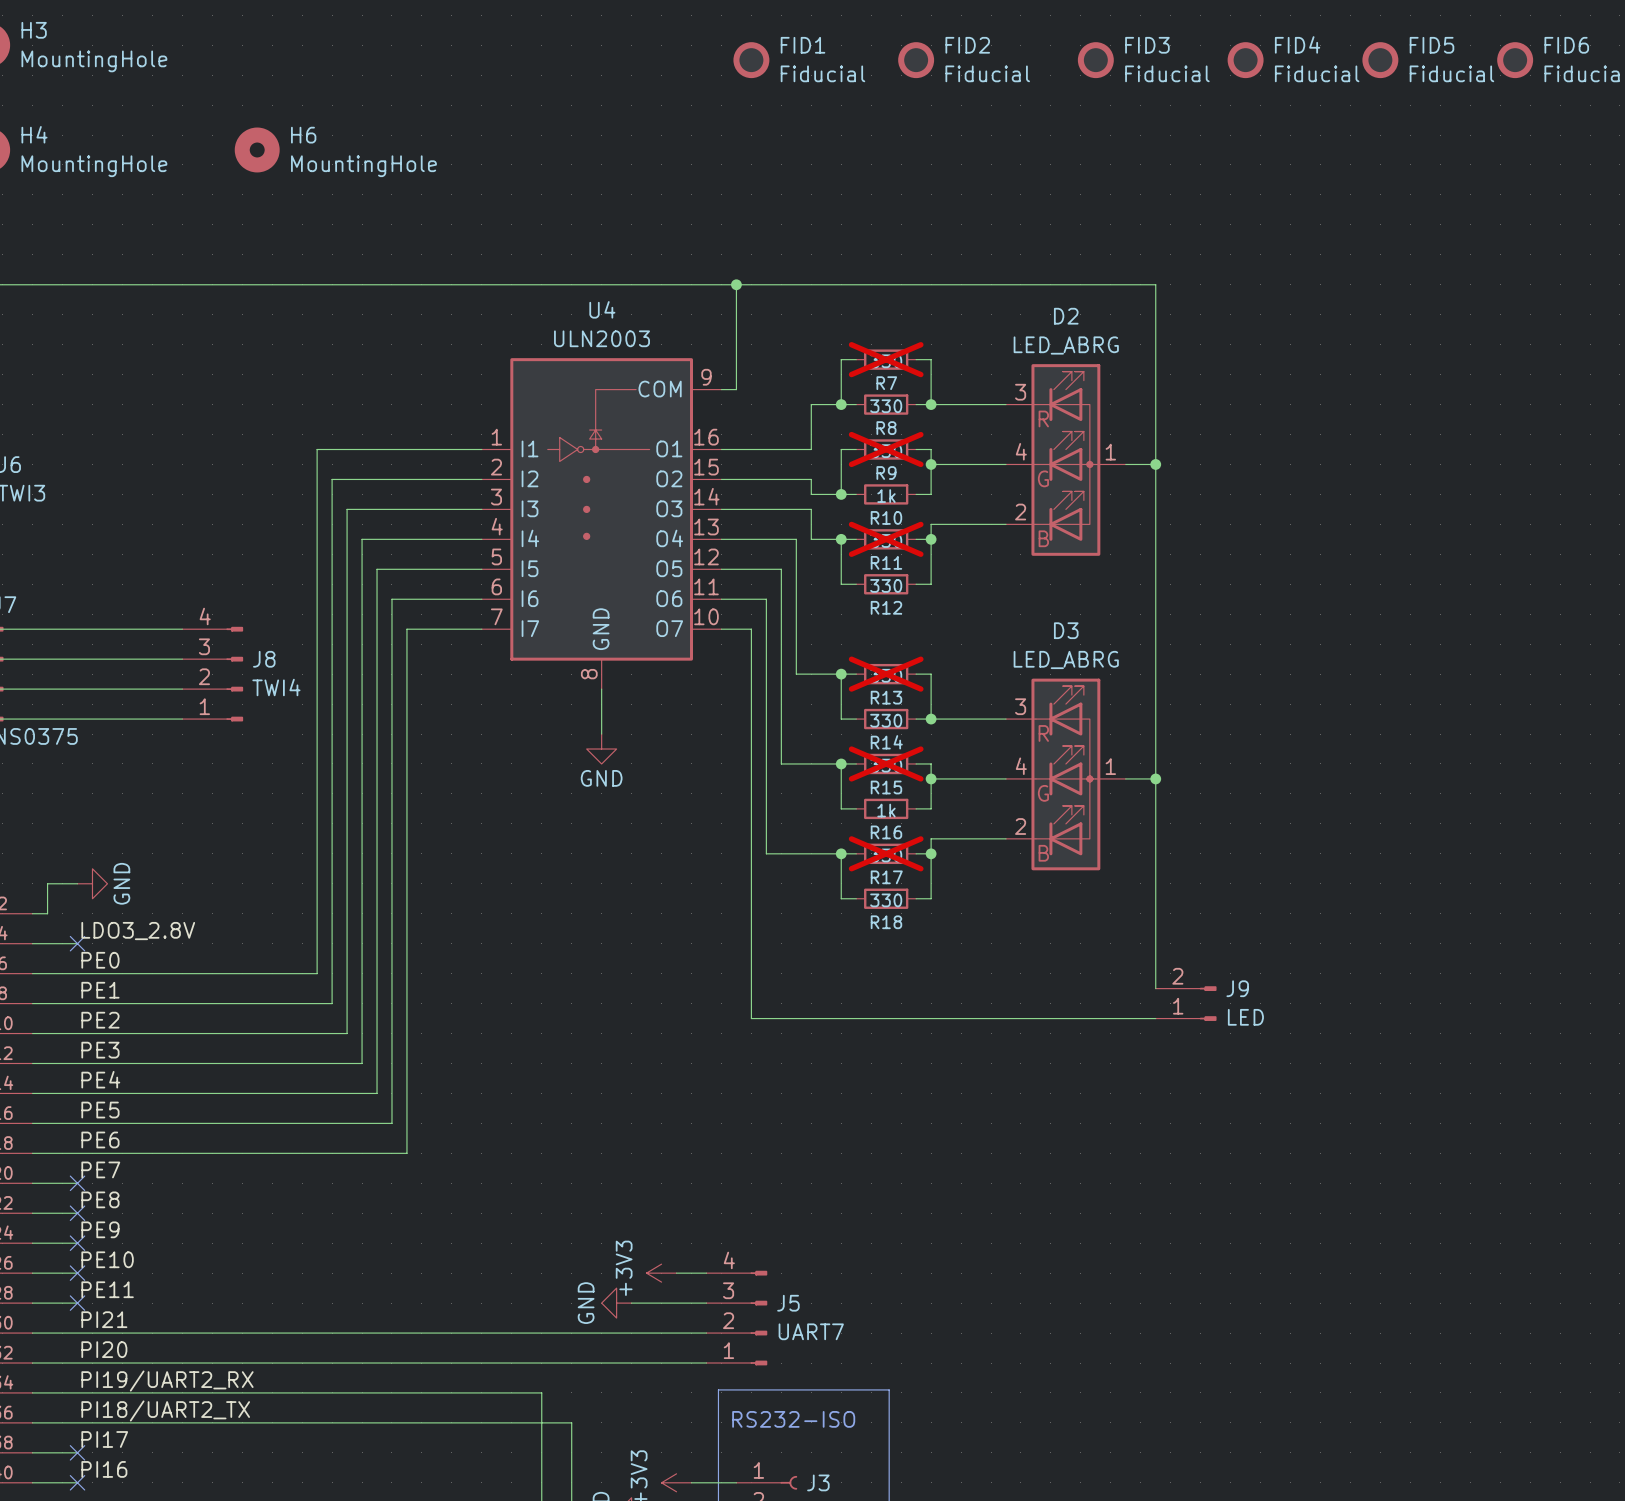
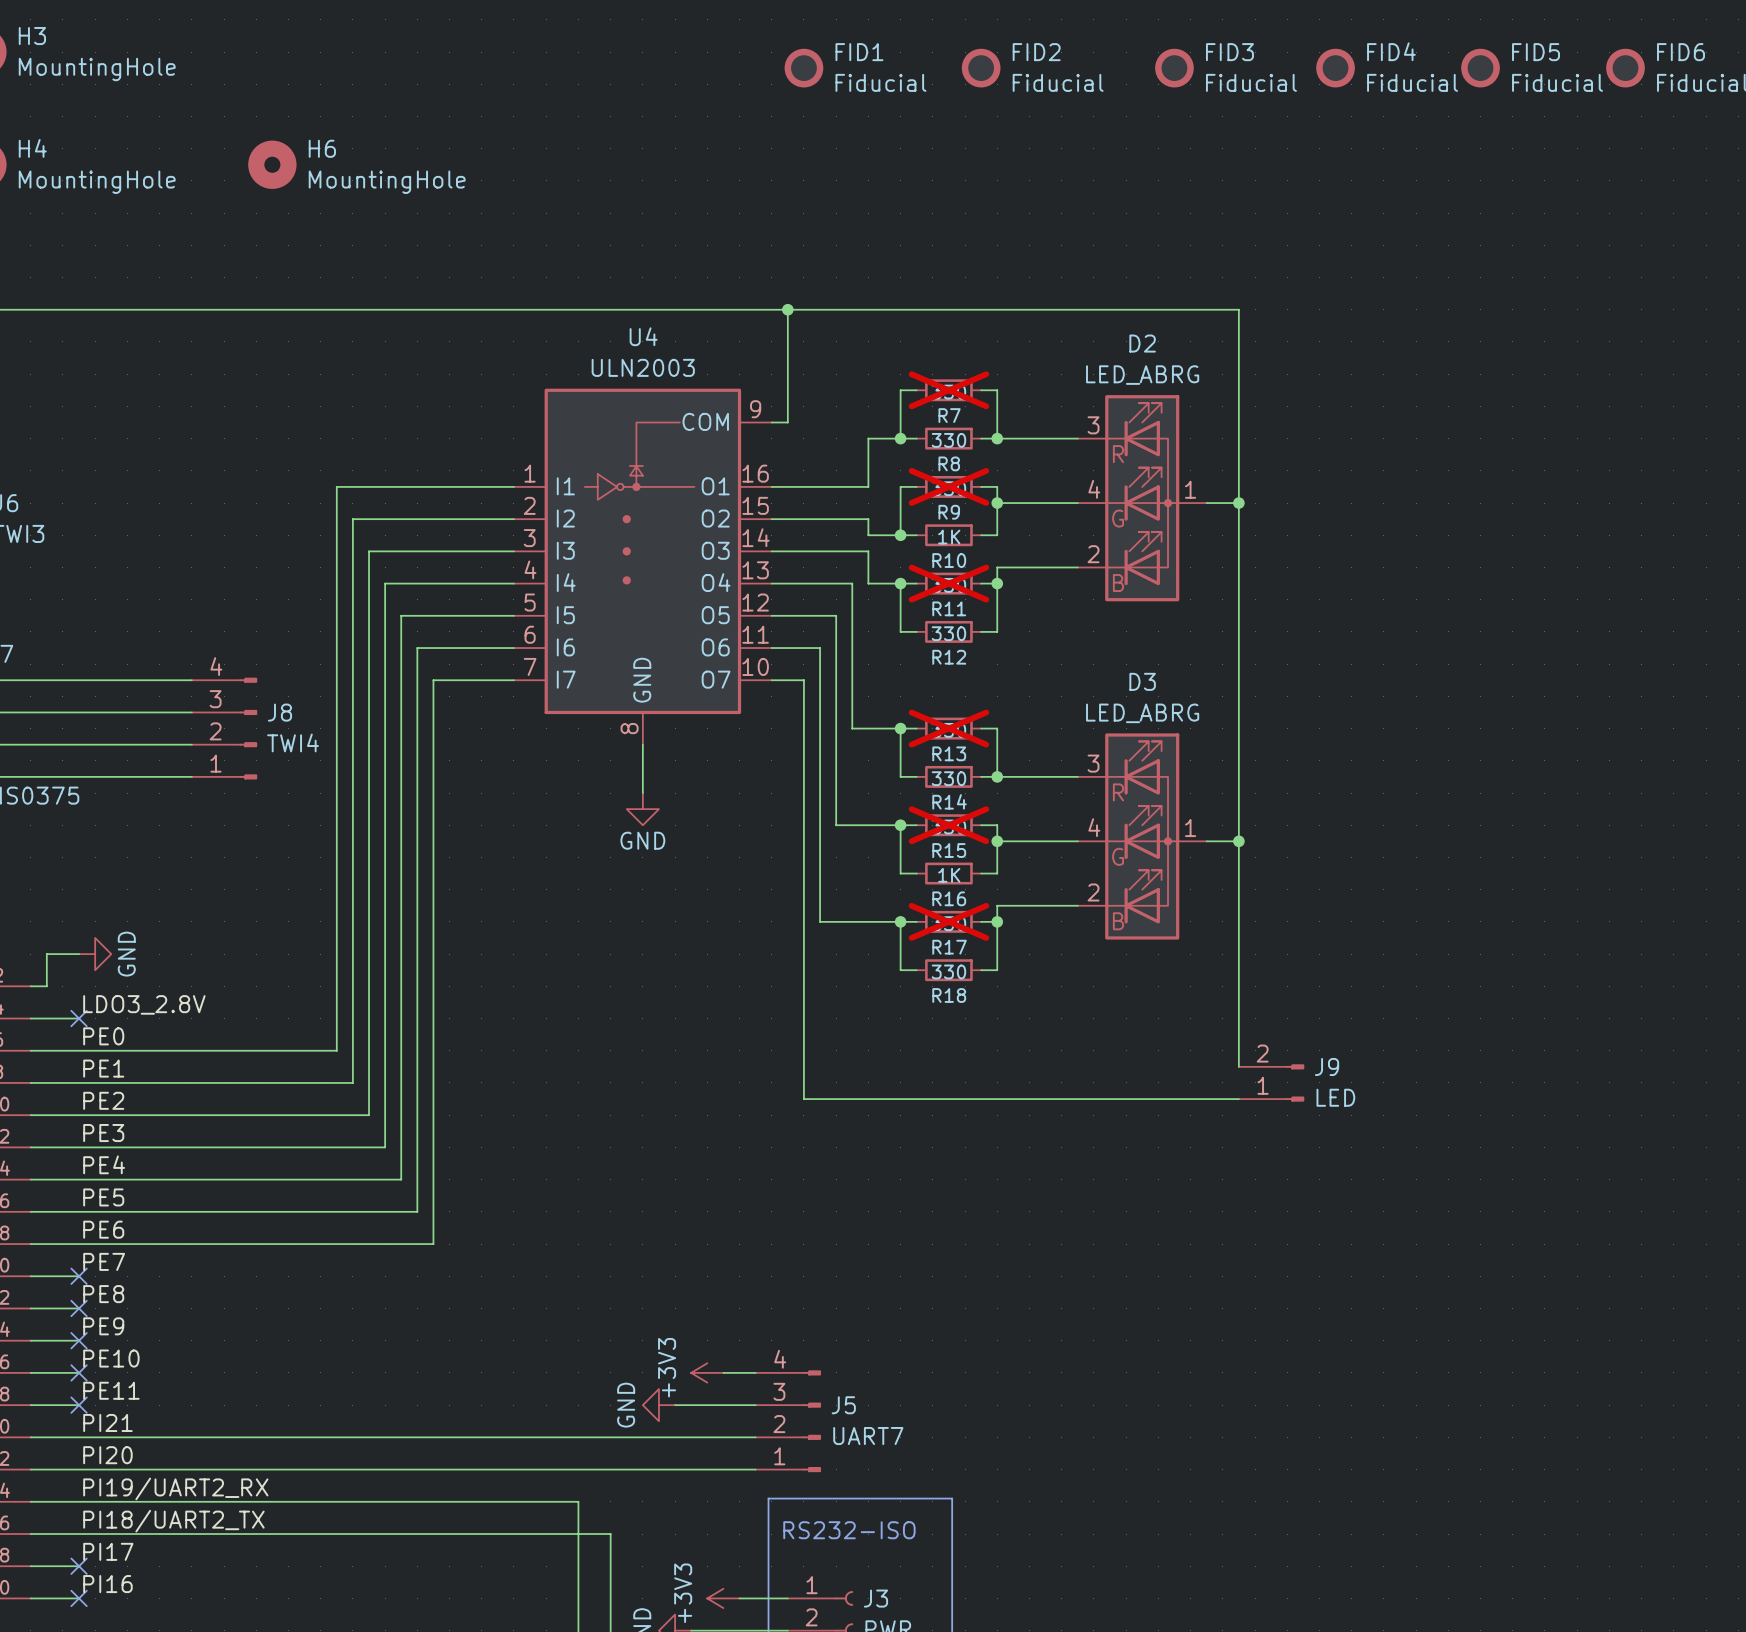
R10 value: 1k (886, 496) -> 1K (949, 537)
R16 value: 1k (886, 810) -> 1K (949, 875)

